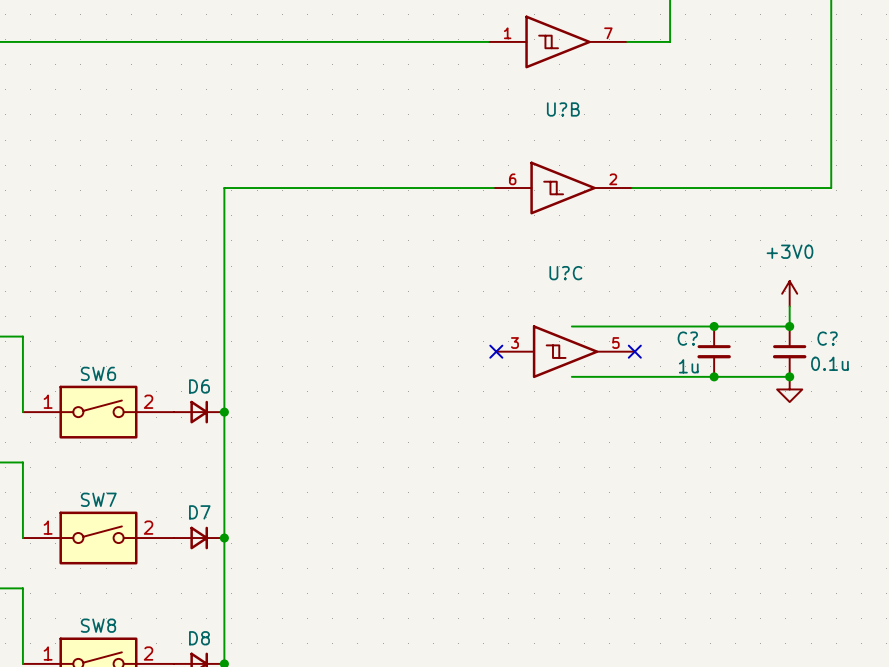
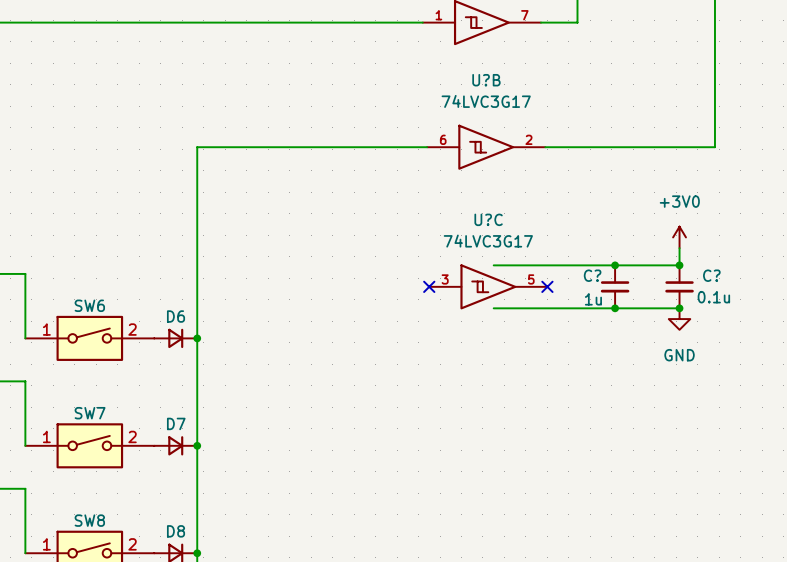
U?B value: none -> 74LVC3G17 (486, 101)
U?C value: none -> 74LVC3G17 (488, 241)
power symbol text: none -> GND (679, 355)

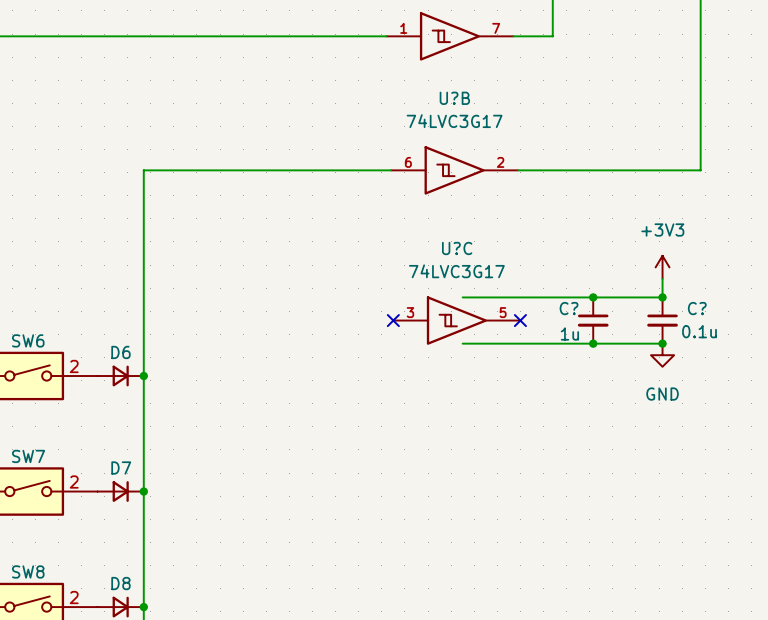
power symbol: +3V0 (679, 237) -> +3V3 (662, 267)

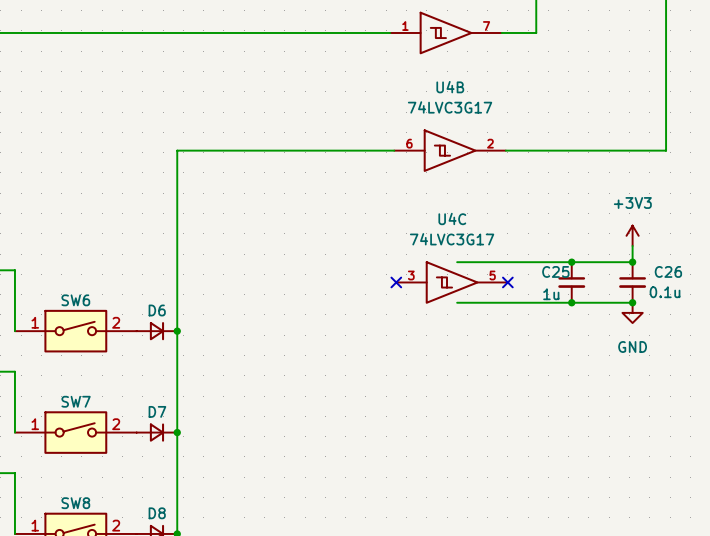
U?B name: U?B (454, 98) -> U4B (450, 87)
U?C name: U?C (457, 248) -> U4C (452, 218)
C? name: C? (569, 308) -> C25 (555, 271)
C? name: C? (697, 308) -> C26 (668, 271)

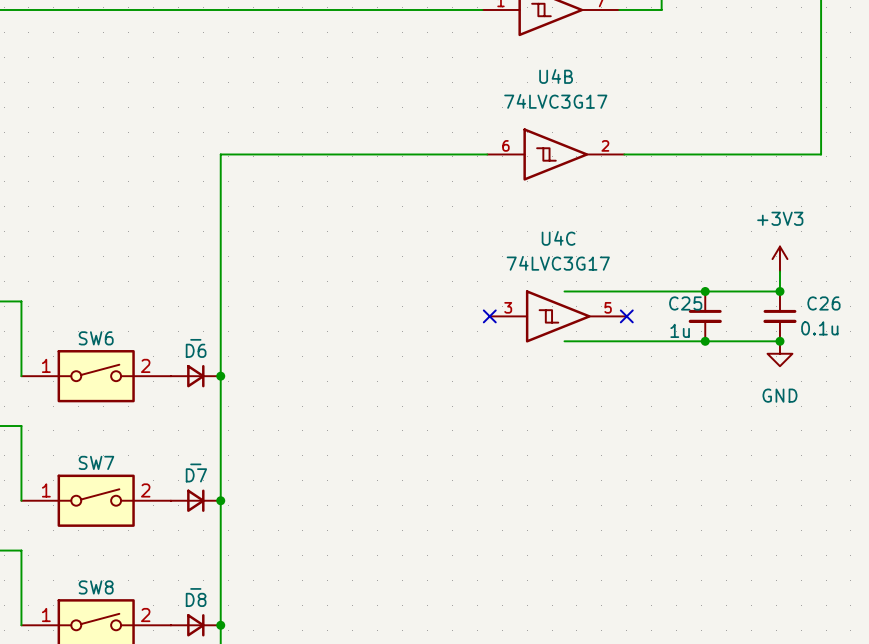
D6 value: none -> - (195, 339)
D7 value: none -> - (195, 464)
D8 value: none -> - (195, 588)

